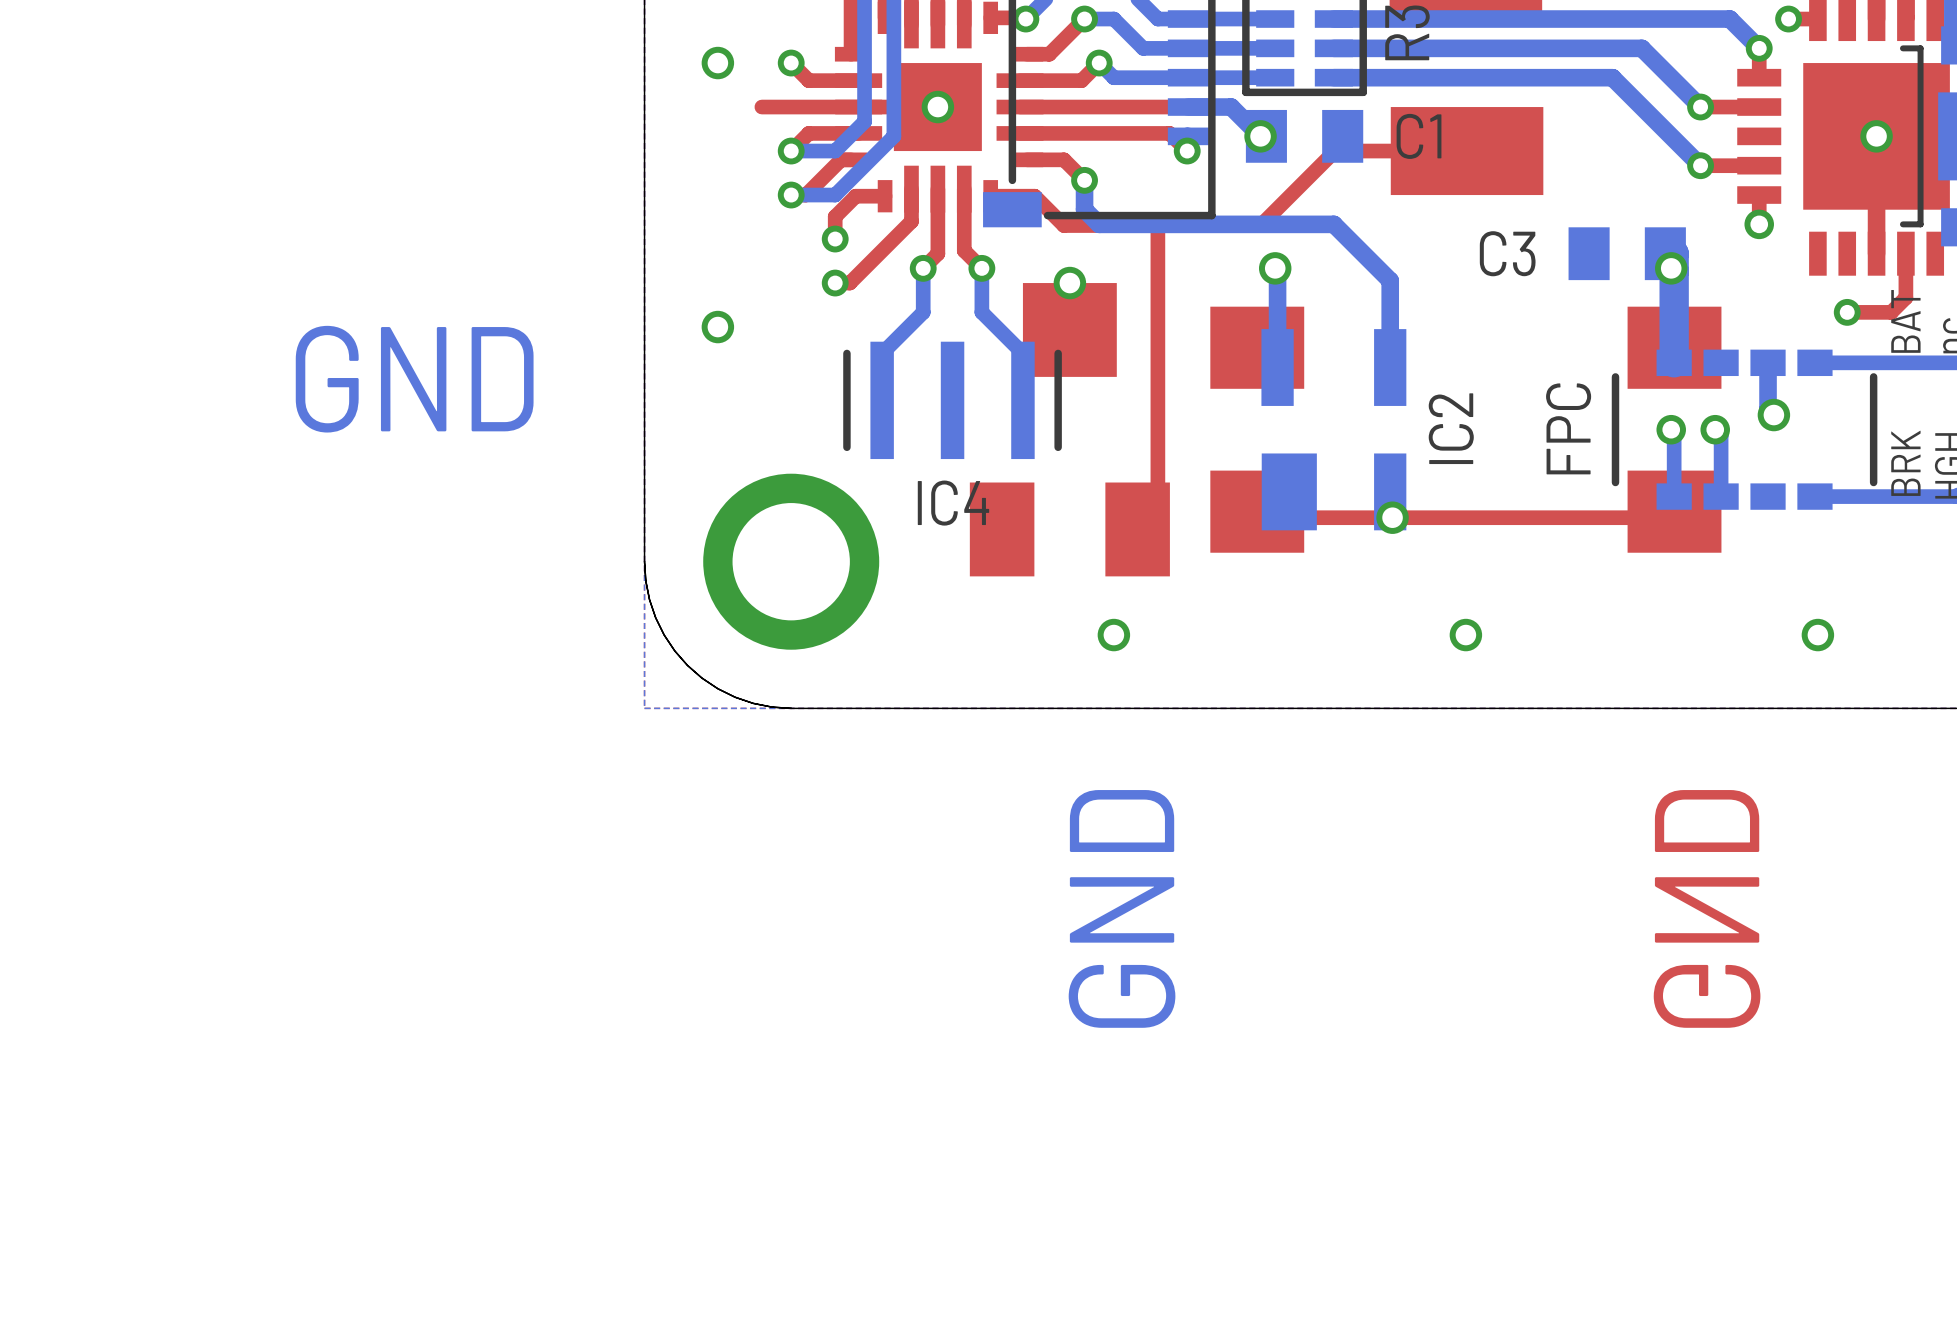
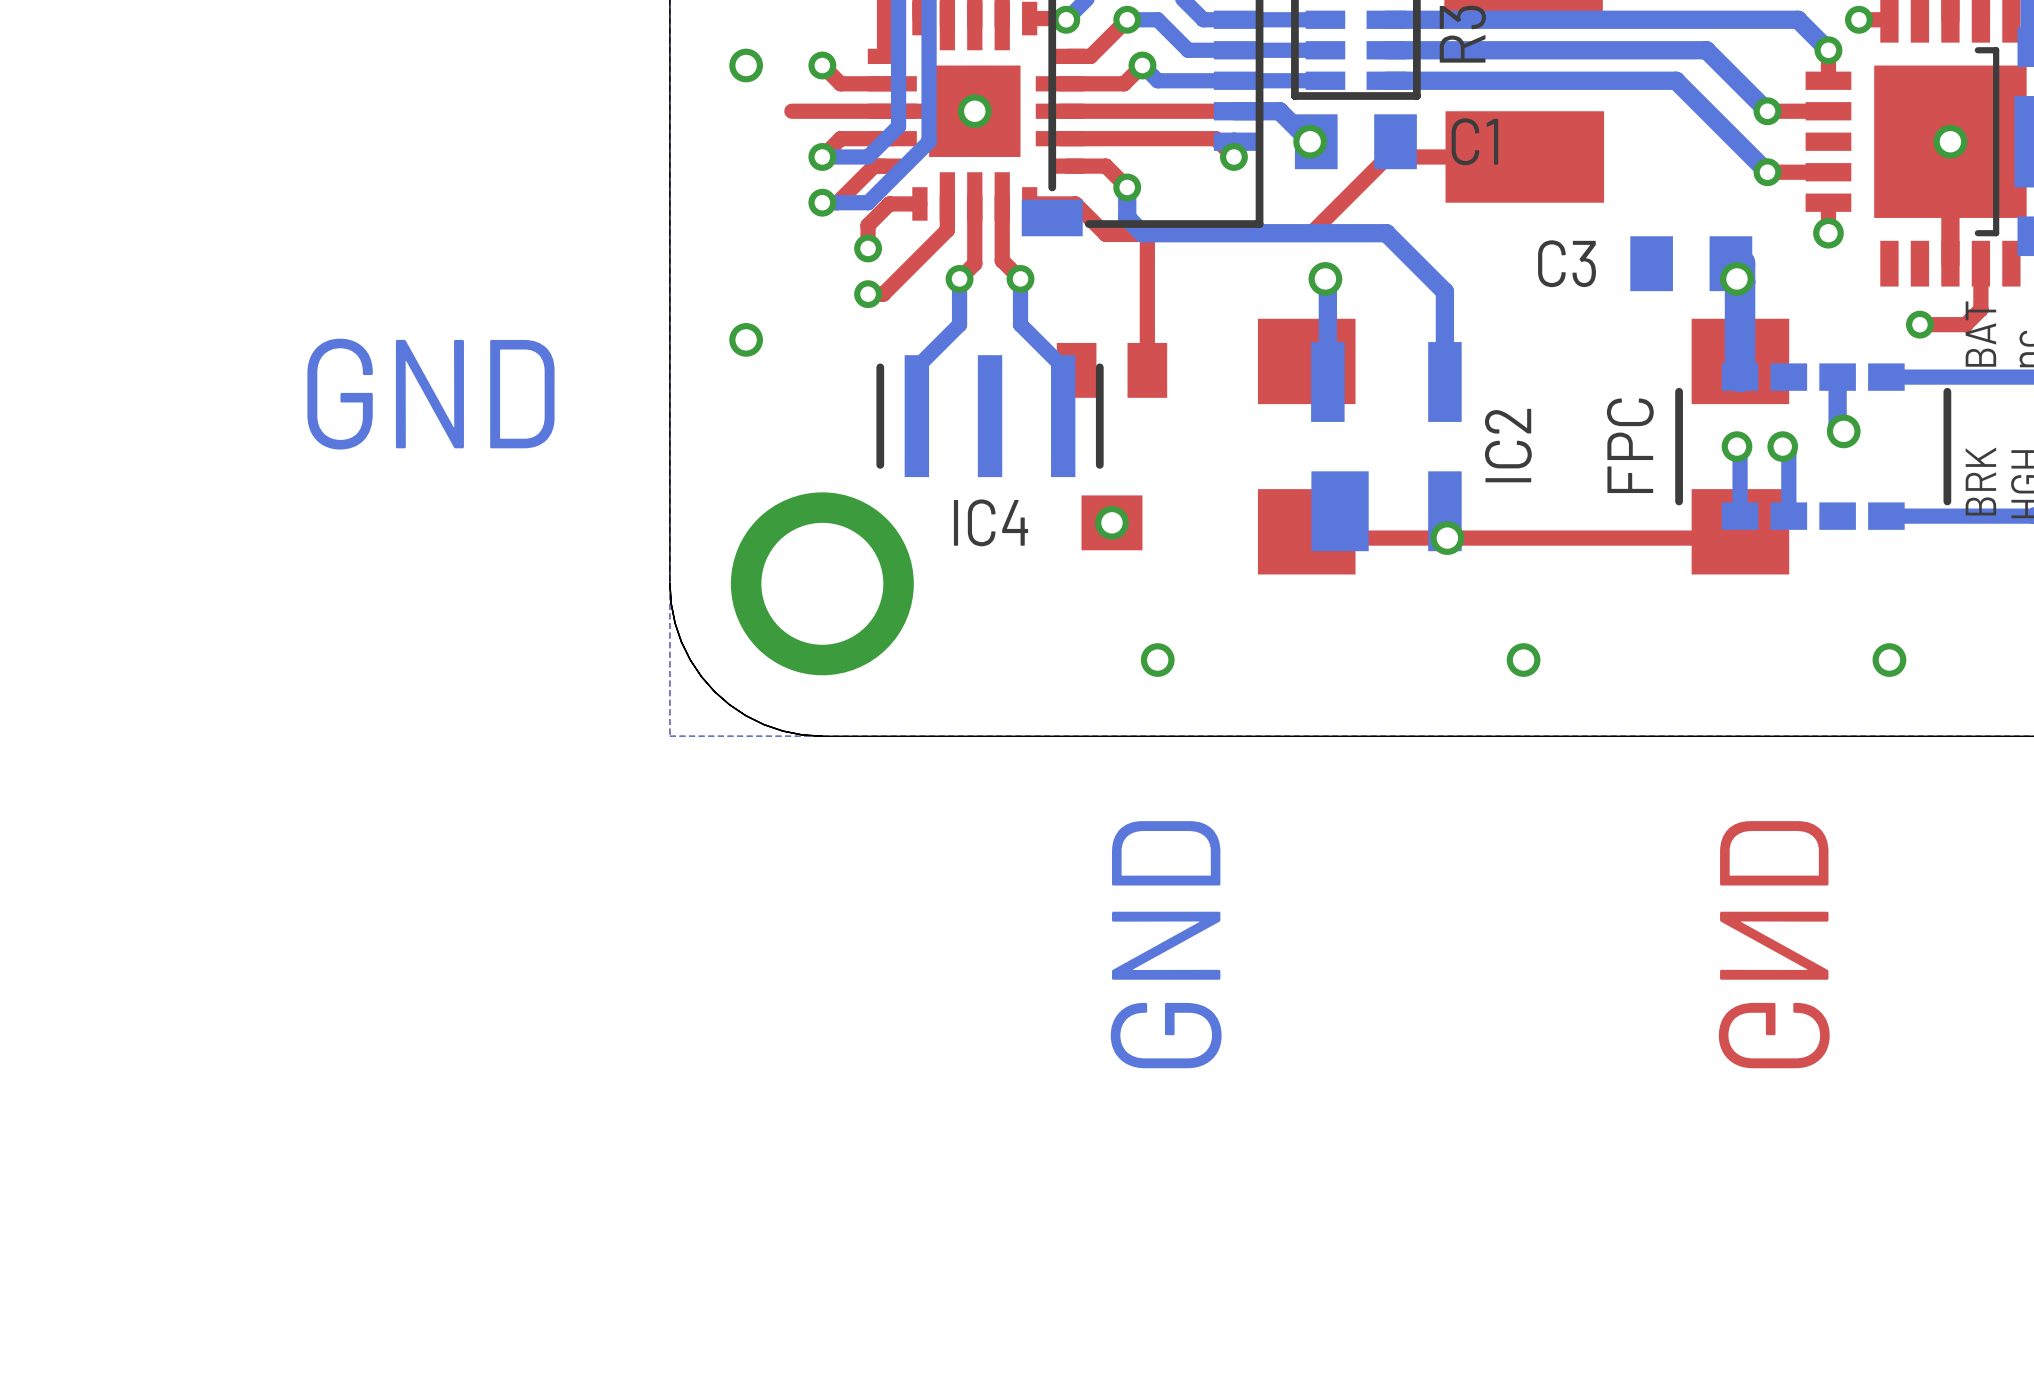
top track: none -> (1147, 234) (1147, 370)
top track: (1157, 225) (1157, 509) (1137, 529) -> none
part footprint: [969, 283, 1170, 577] -> [1056, 342, 1168, 551]
via position: (1069, 283) -> (1111, 522)

